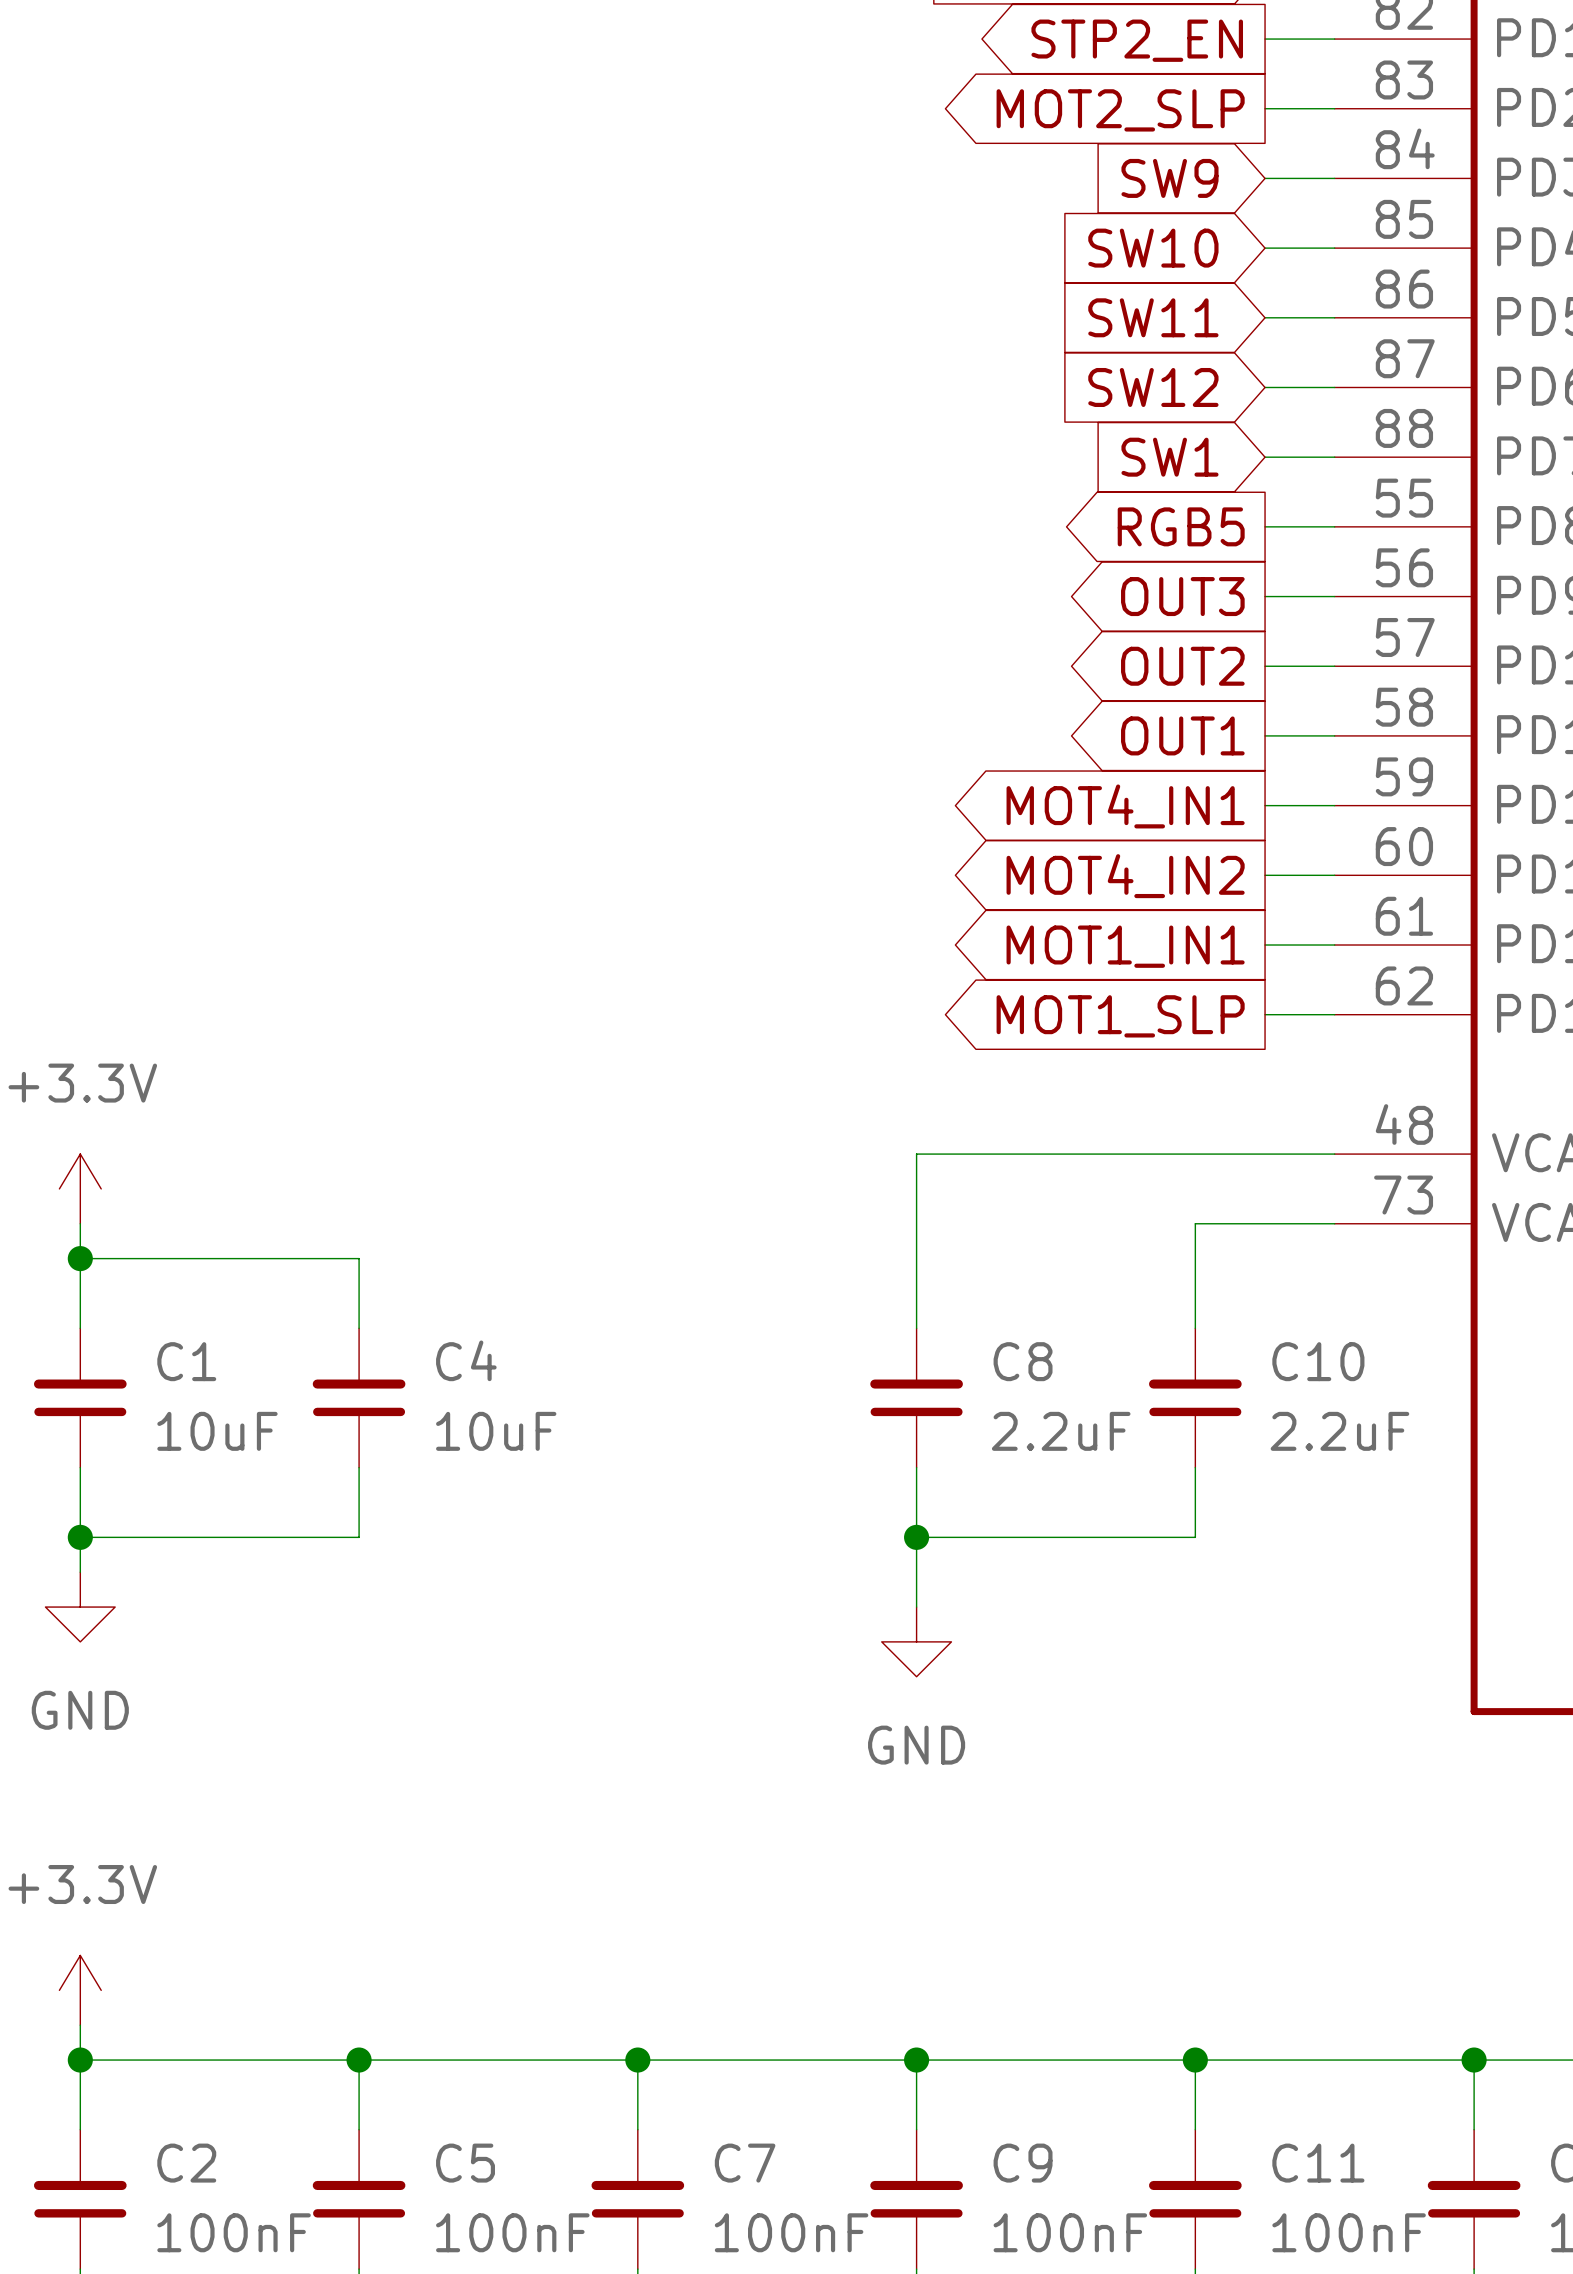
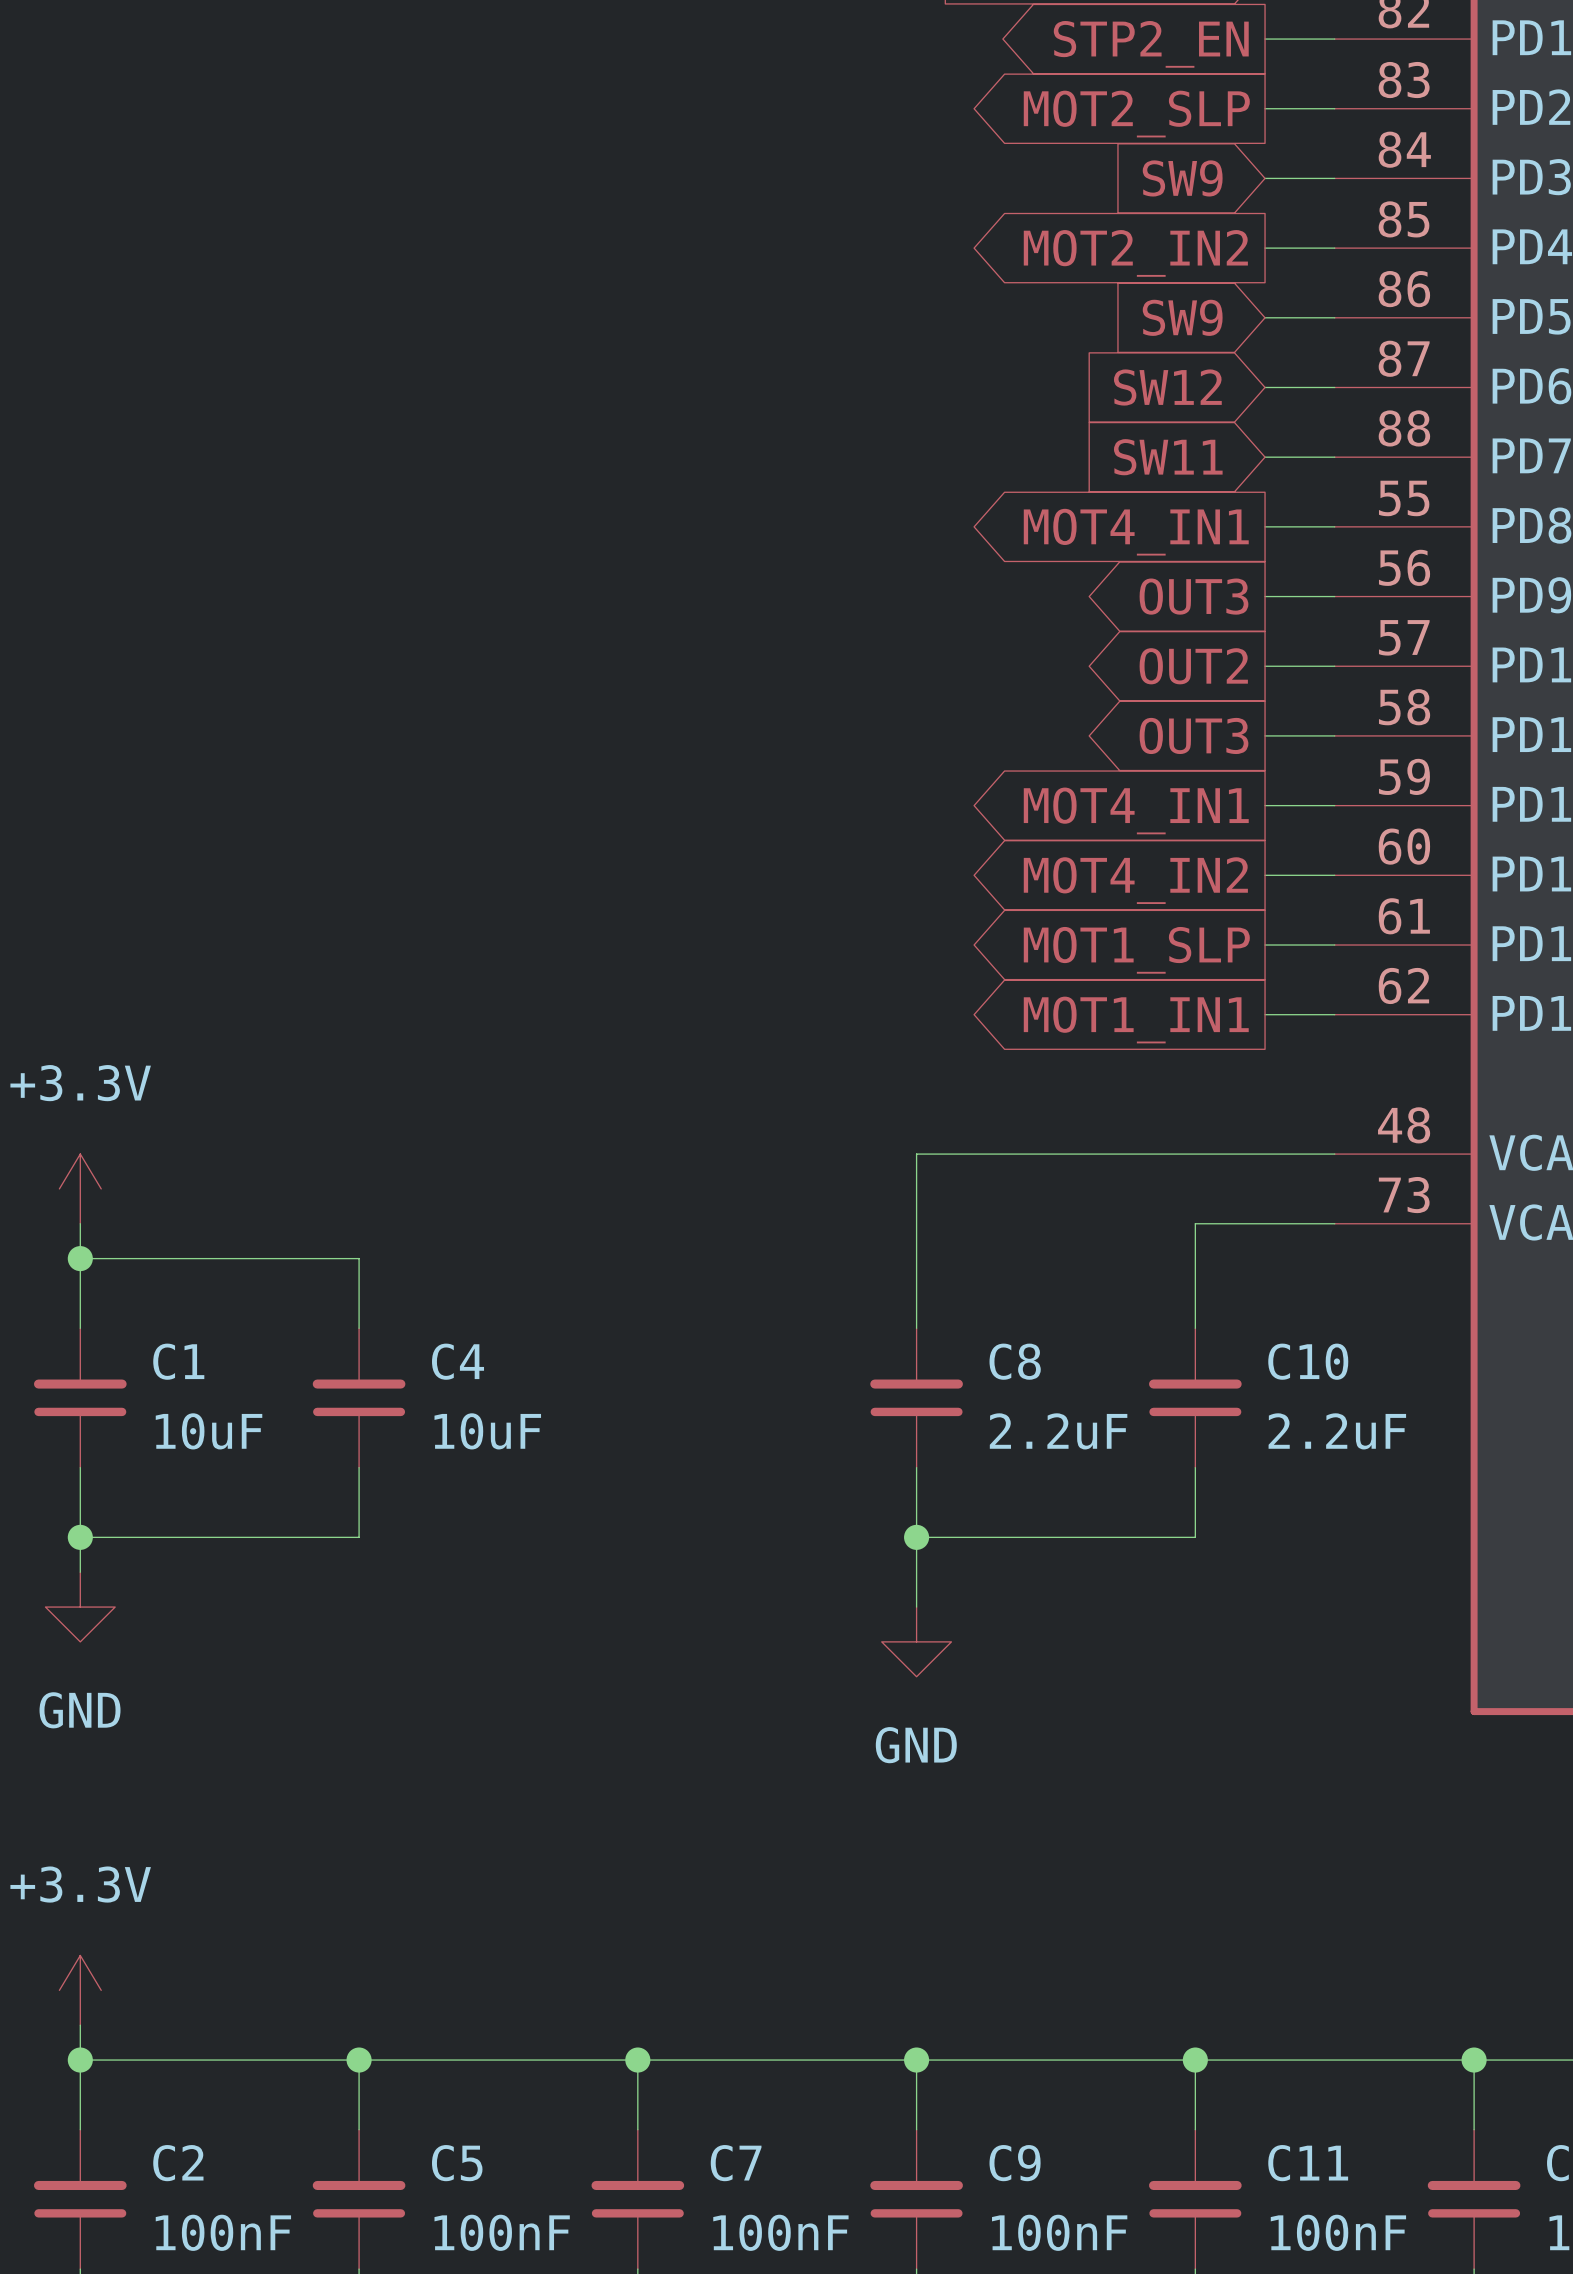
global label shape: input (1153, 248) -> output (1135, 253)
global label: SW10 (1153, 248) -> MOT2_IN2 (1135, 253)
global label: SW11 (1153, 317) -> SW9 (1182, 317)
global label: SW1 (1169, 457) -> SW11 (1168, 457)
global label: RGB5 (1181, 526) -> MOT4_IN1 (1136, 532)
global label: OUT1 (1182, 735) -> OUT3 (1193, 735)
global label: MOT1_IN1 (1125, 946) -> MOT1_SLP (1136, 950)
global label: MOT1_SLP (1120, 1016) -> MOT1_IN1 (1136, 1020)

